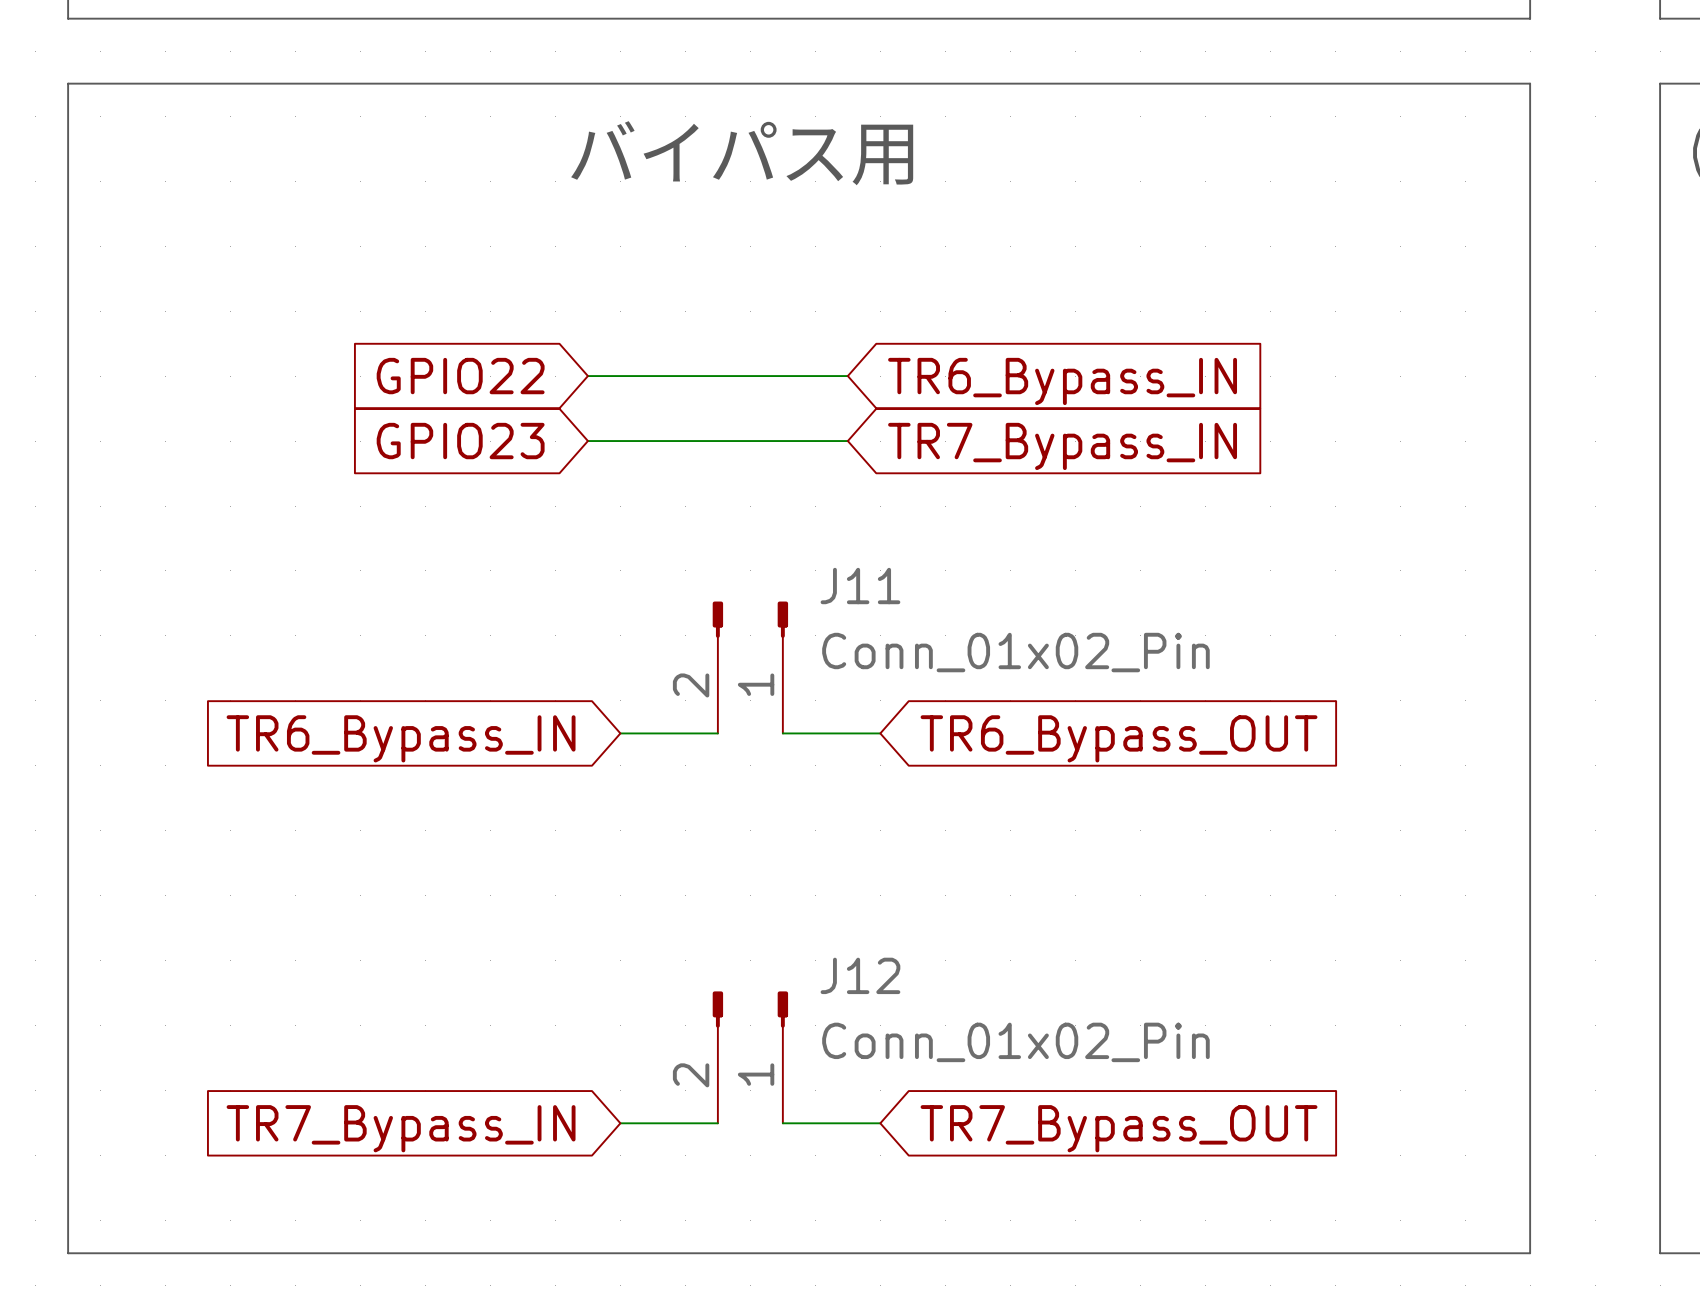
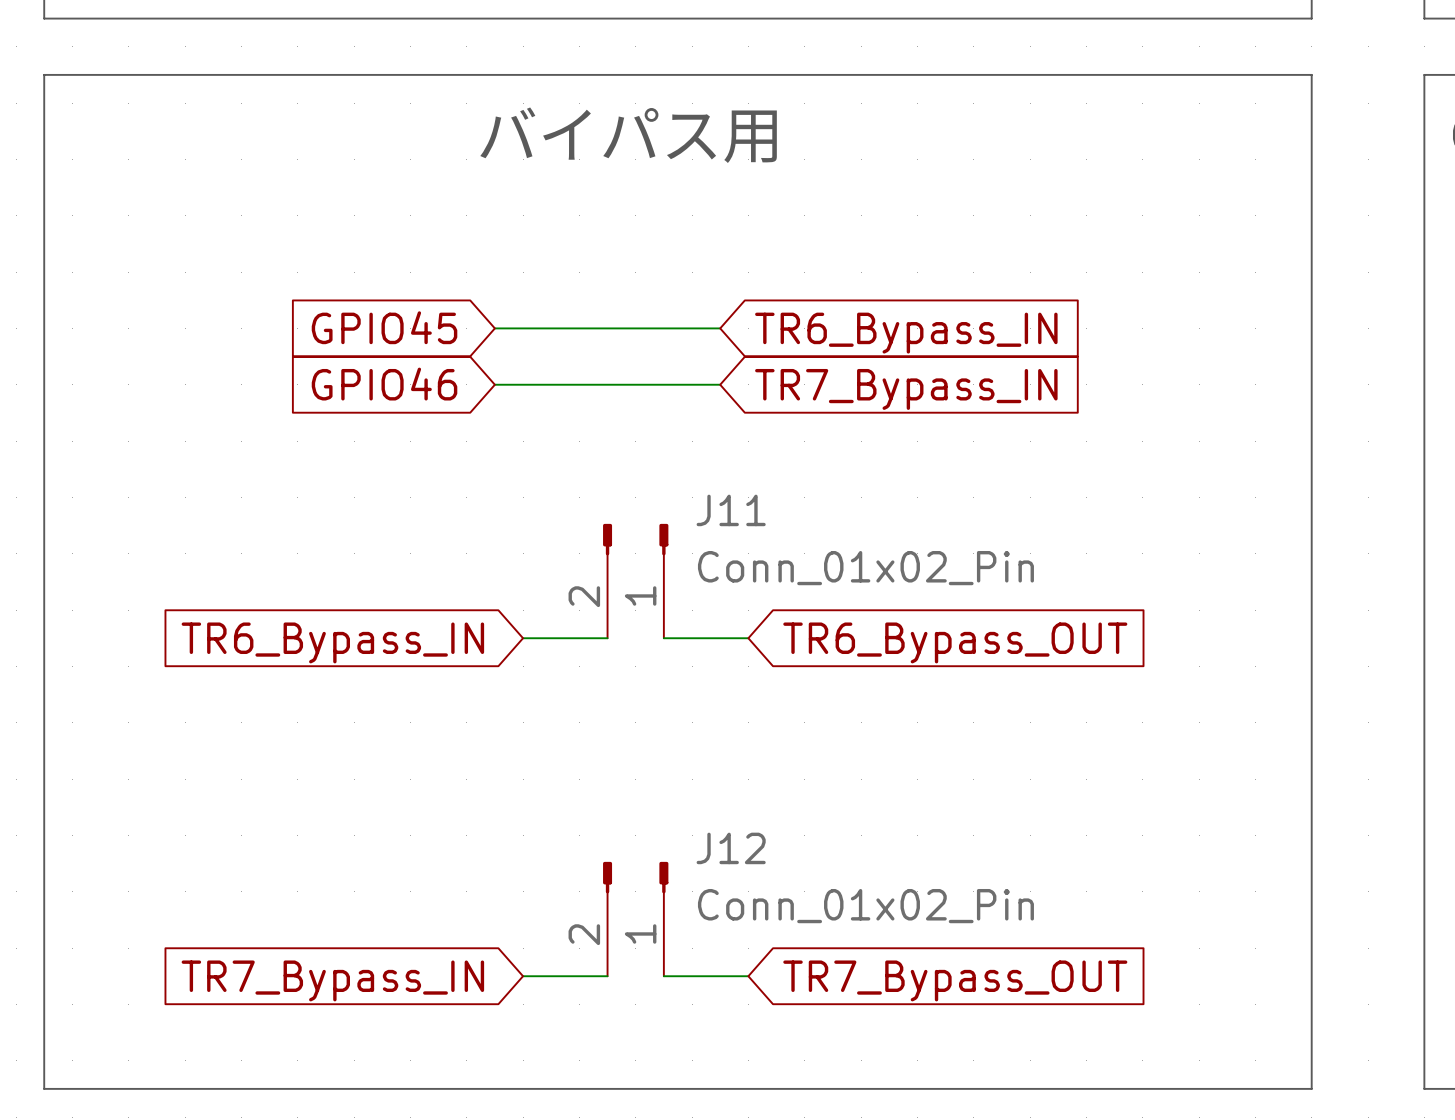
global label: GPIO22 (460, 376) -> GPIO45 (384, 327)
global label: GPIO23 (460, 441) -> GPIO46 (384, 384)

